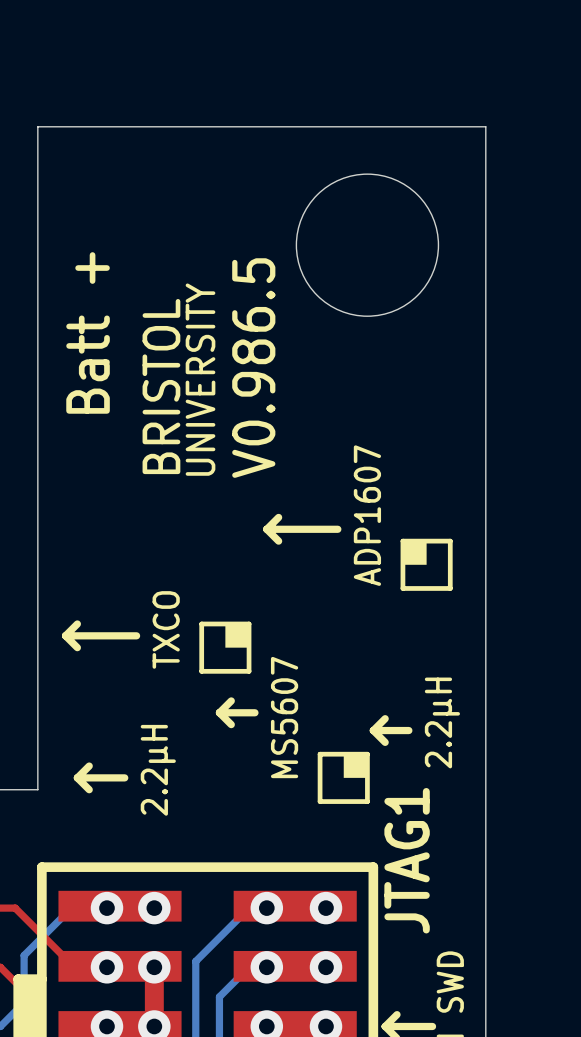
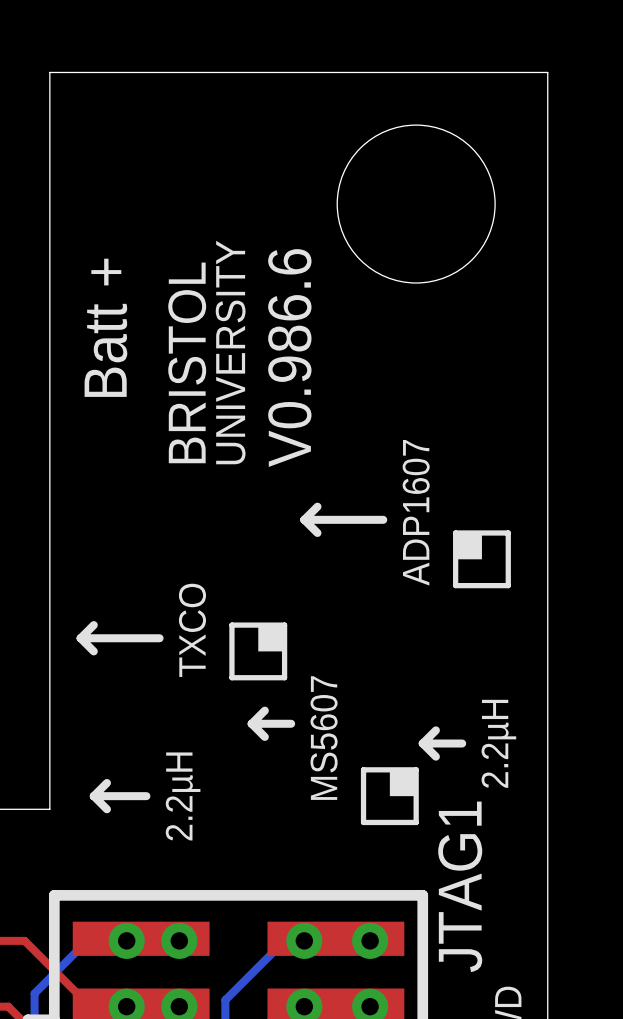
text: V0.986.5 (253, 368) -> V0.986.6 (289, 358)

